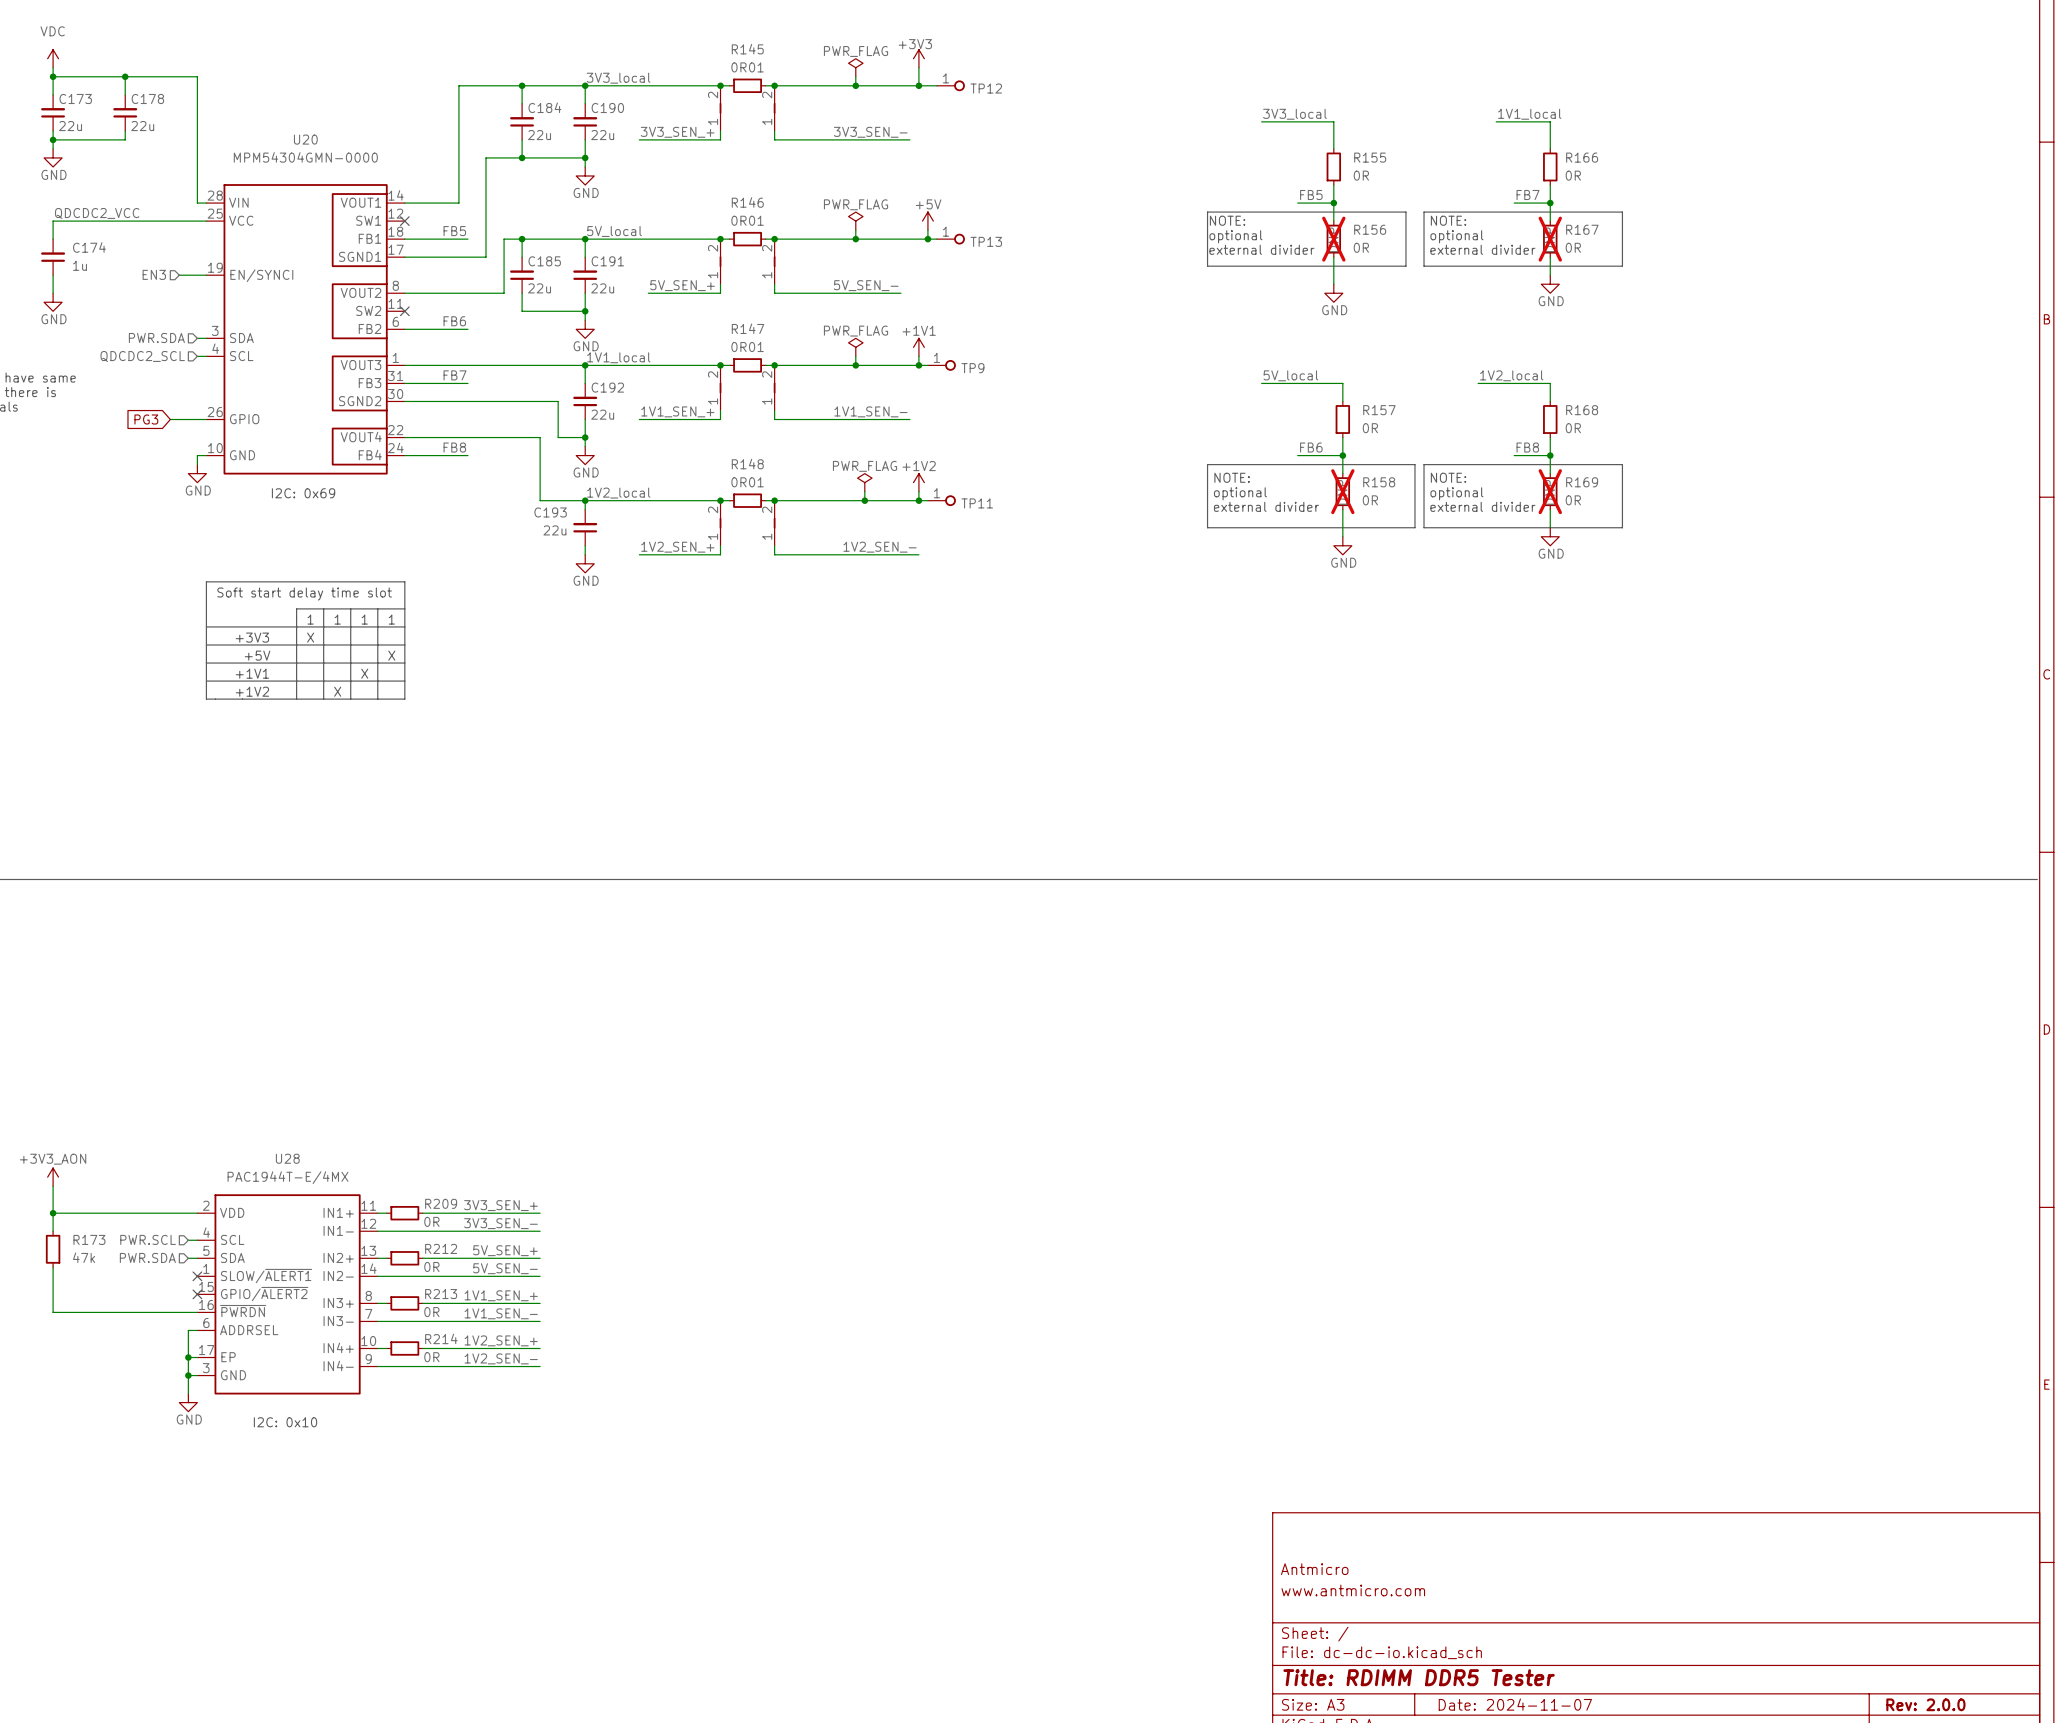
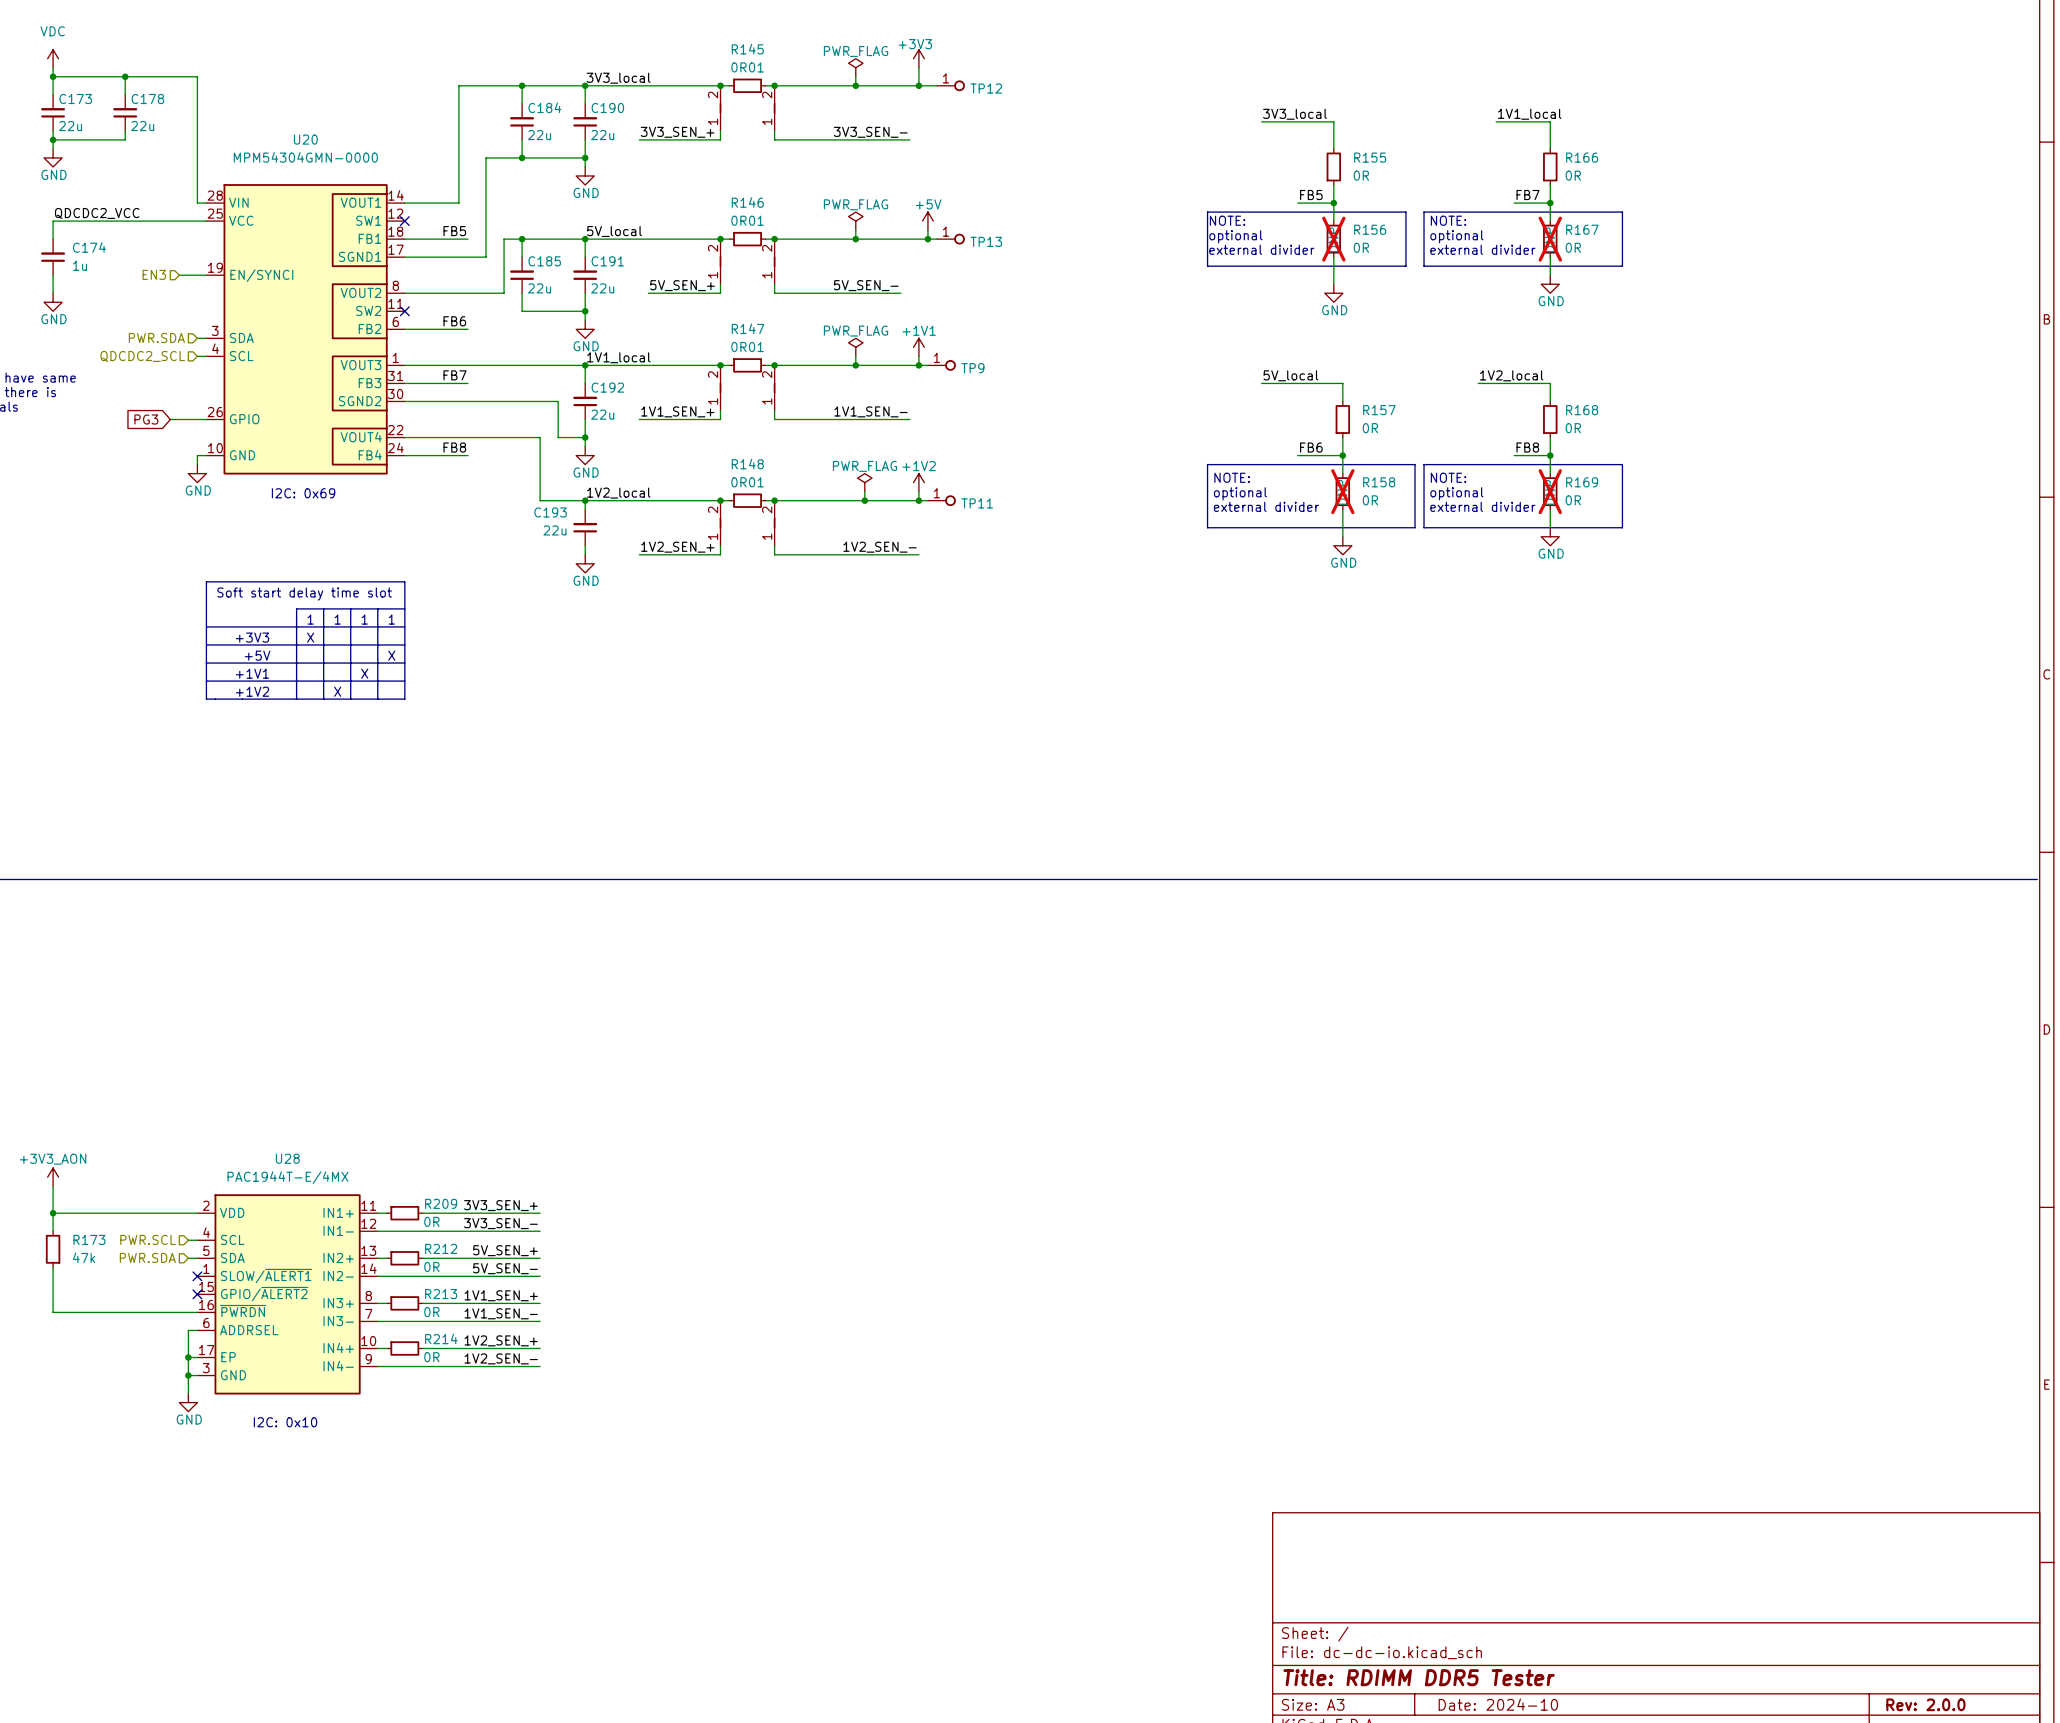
title block: Antmicro (1314, 1569) -> none
title block: www.antmicro.com (1353, 1590) -> none
title block: Date: 2024-11-07 (1515, 1704) -> Date: 2024-10 (1498, 1704)

